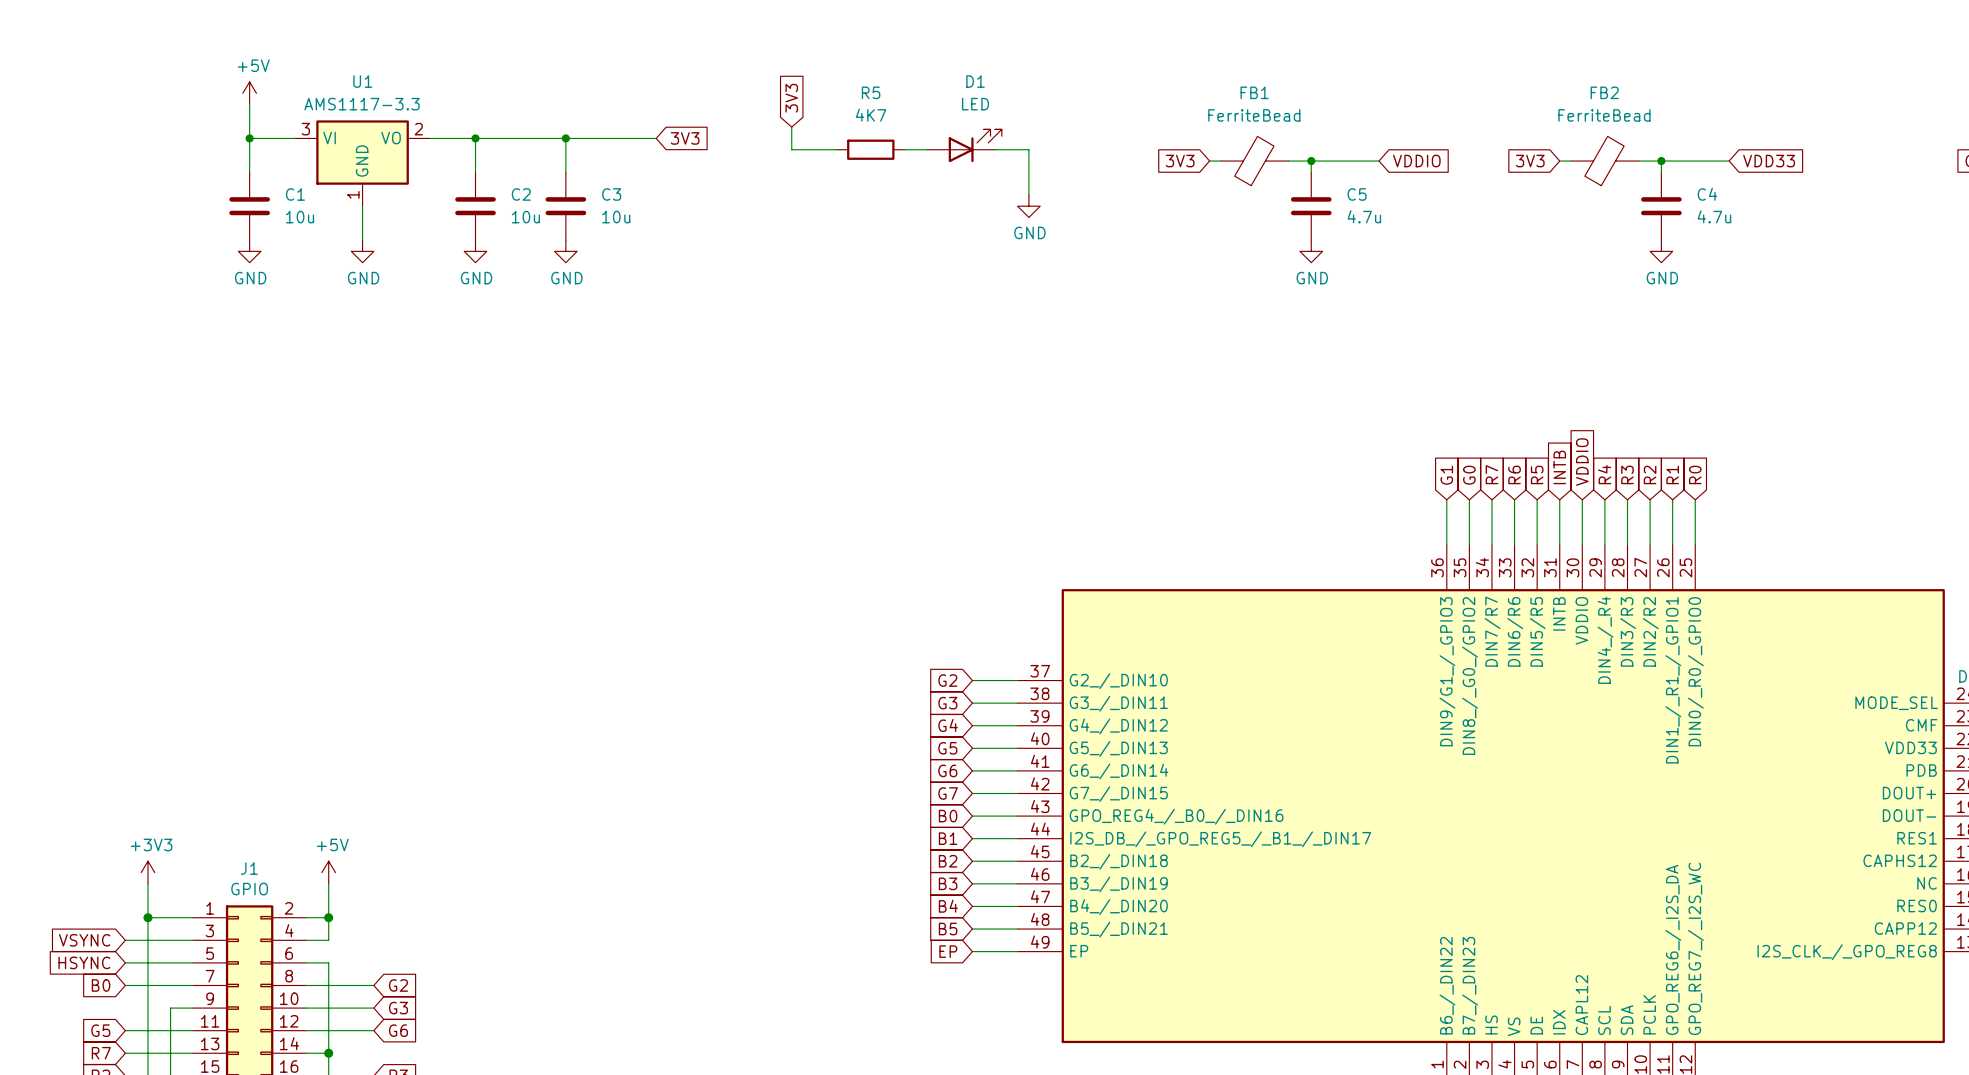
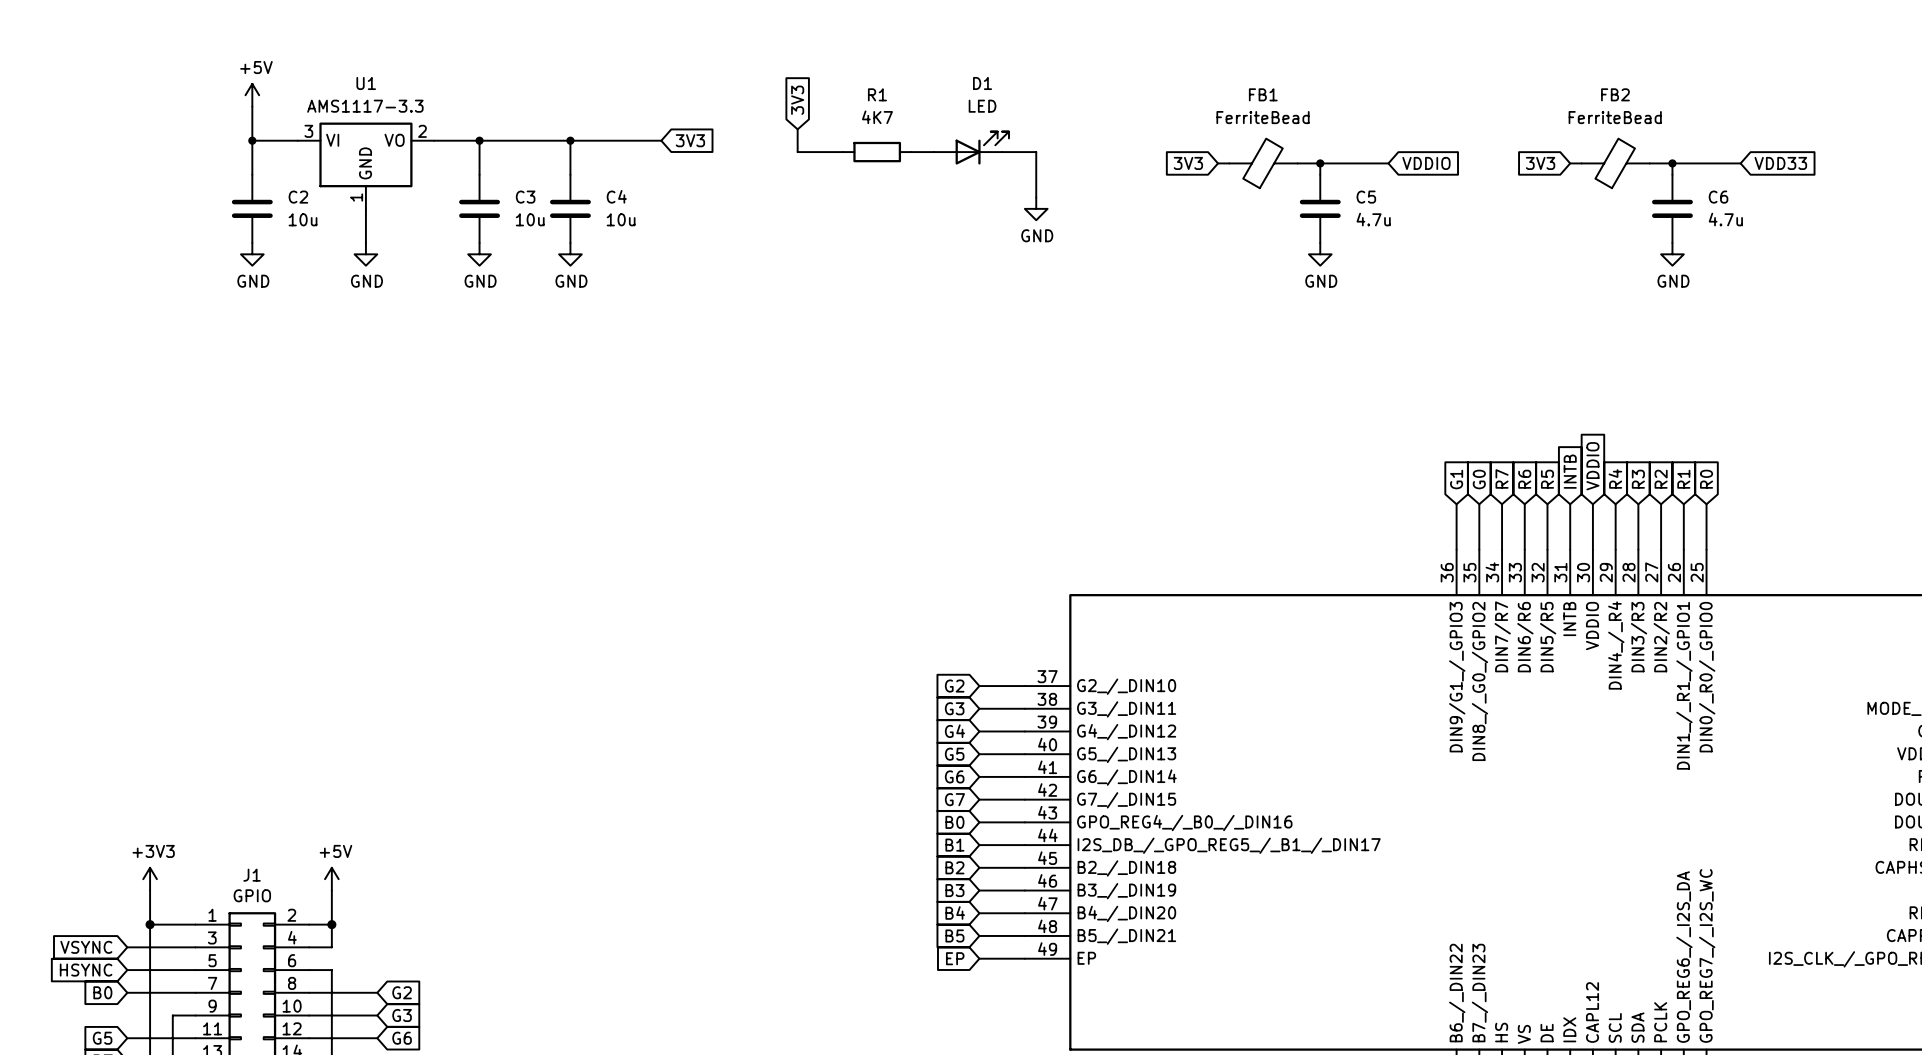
R5 name: R5 (871, 92) -> R1 (877, 94)
C1 name: C1 (295, 194) -> C2 (298, 197)
C2 name: C2 (521, 194) -> C3 (525, 197)
C3 name: C3 (611, 194) -> C4 (616, 196)
C4 name: C4 (1707, 194) -> C6 (1718, 197)

